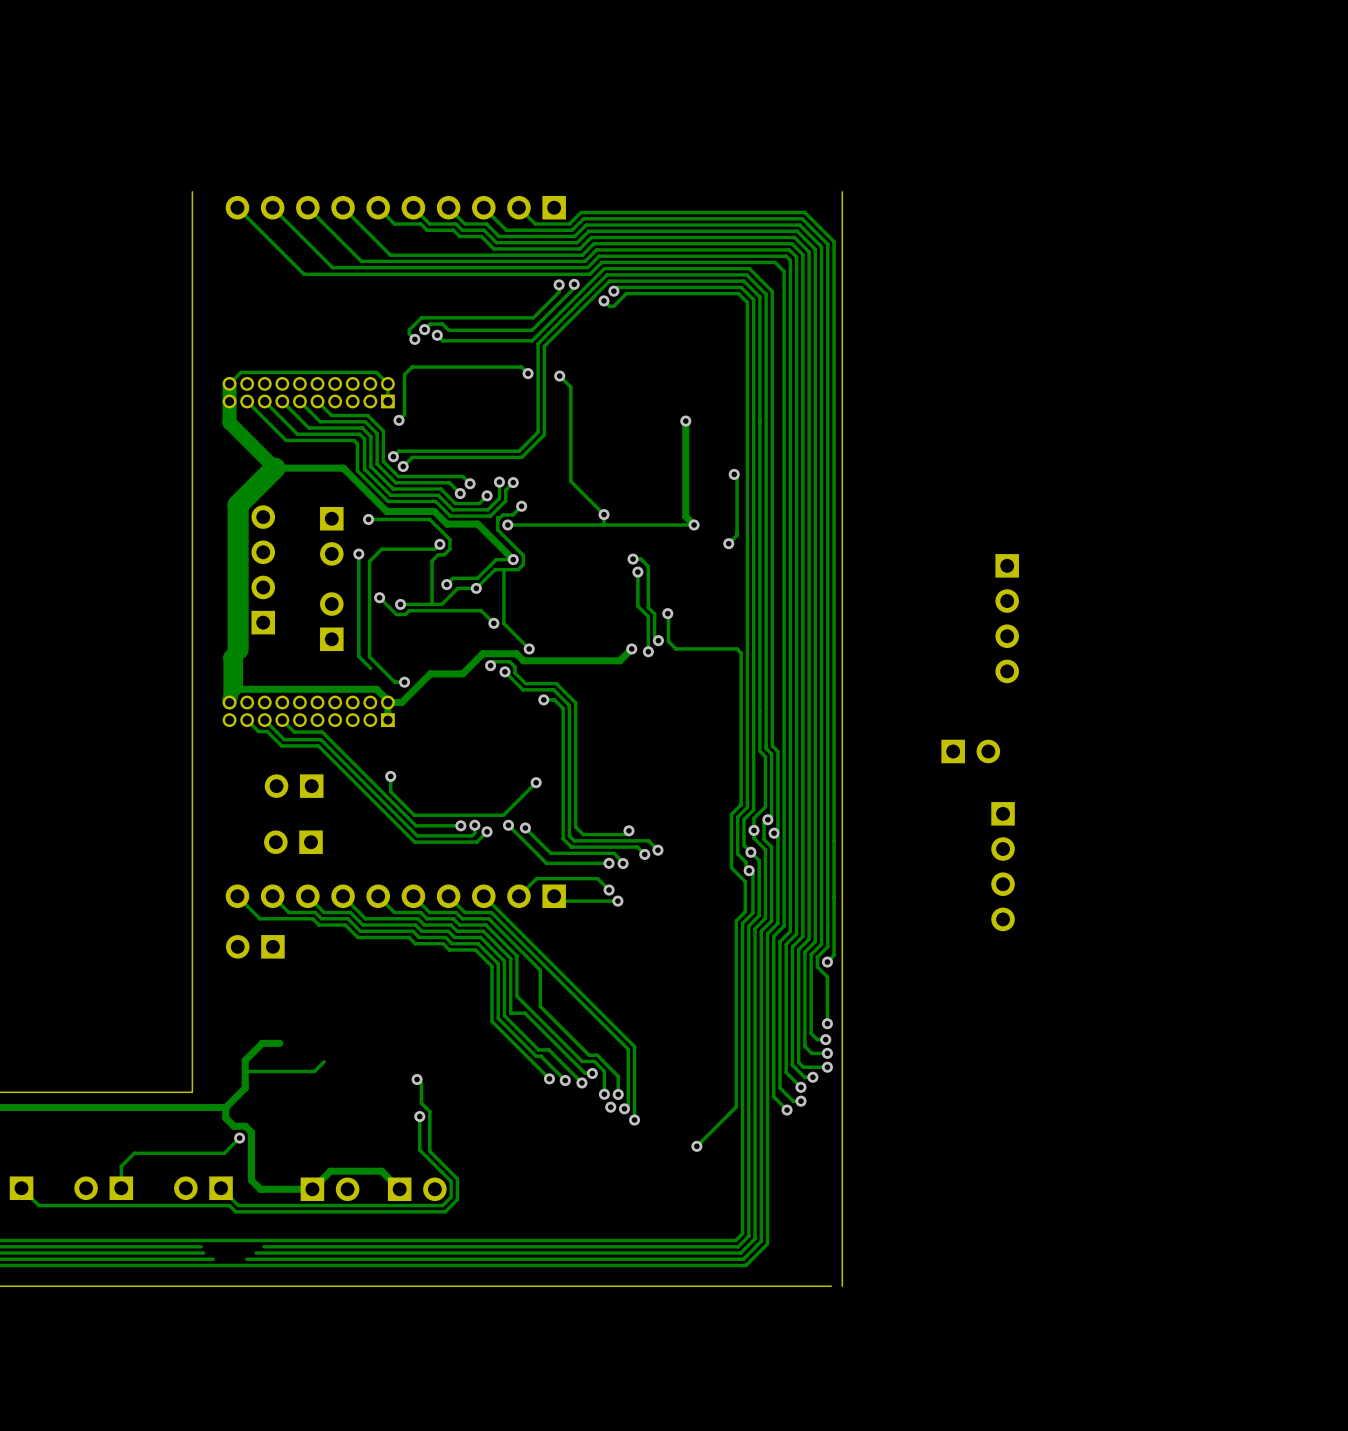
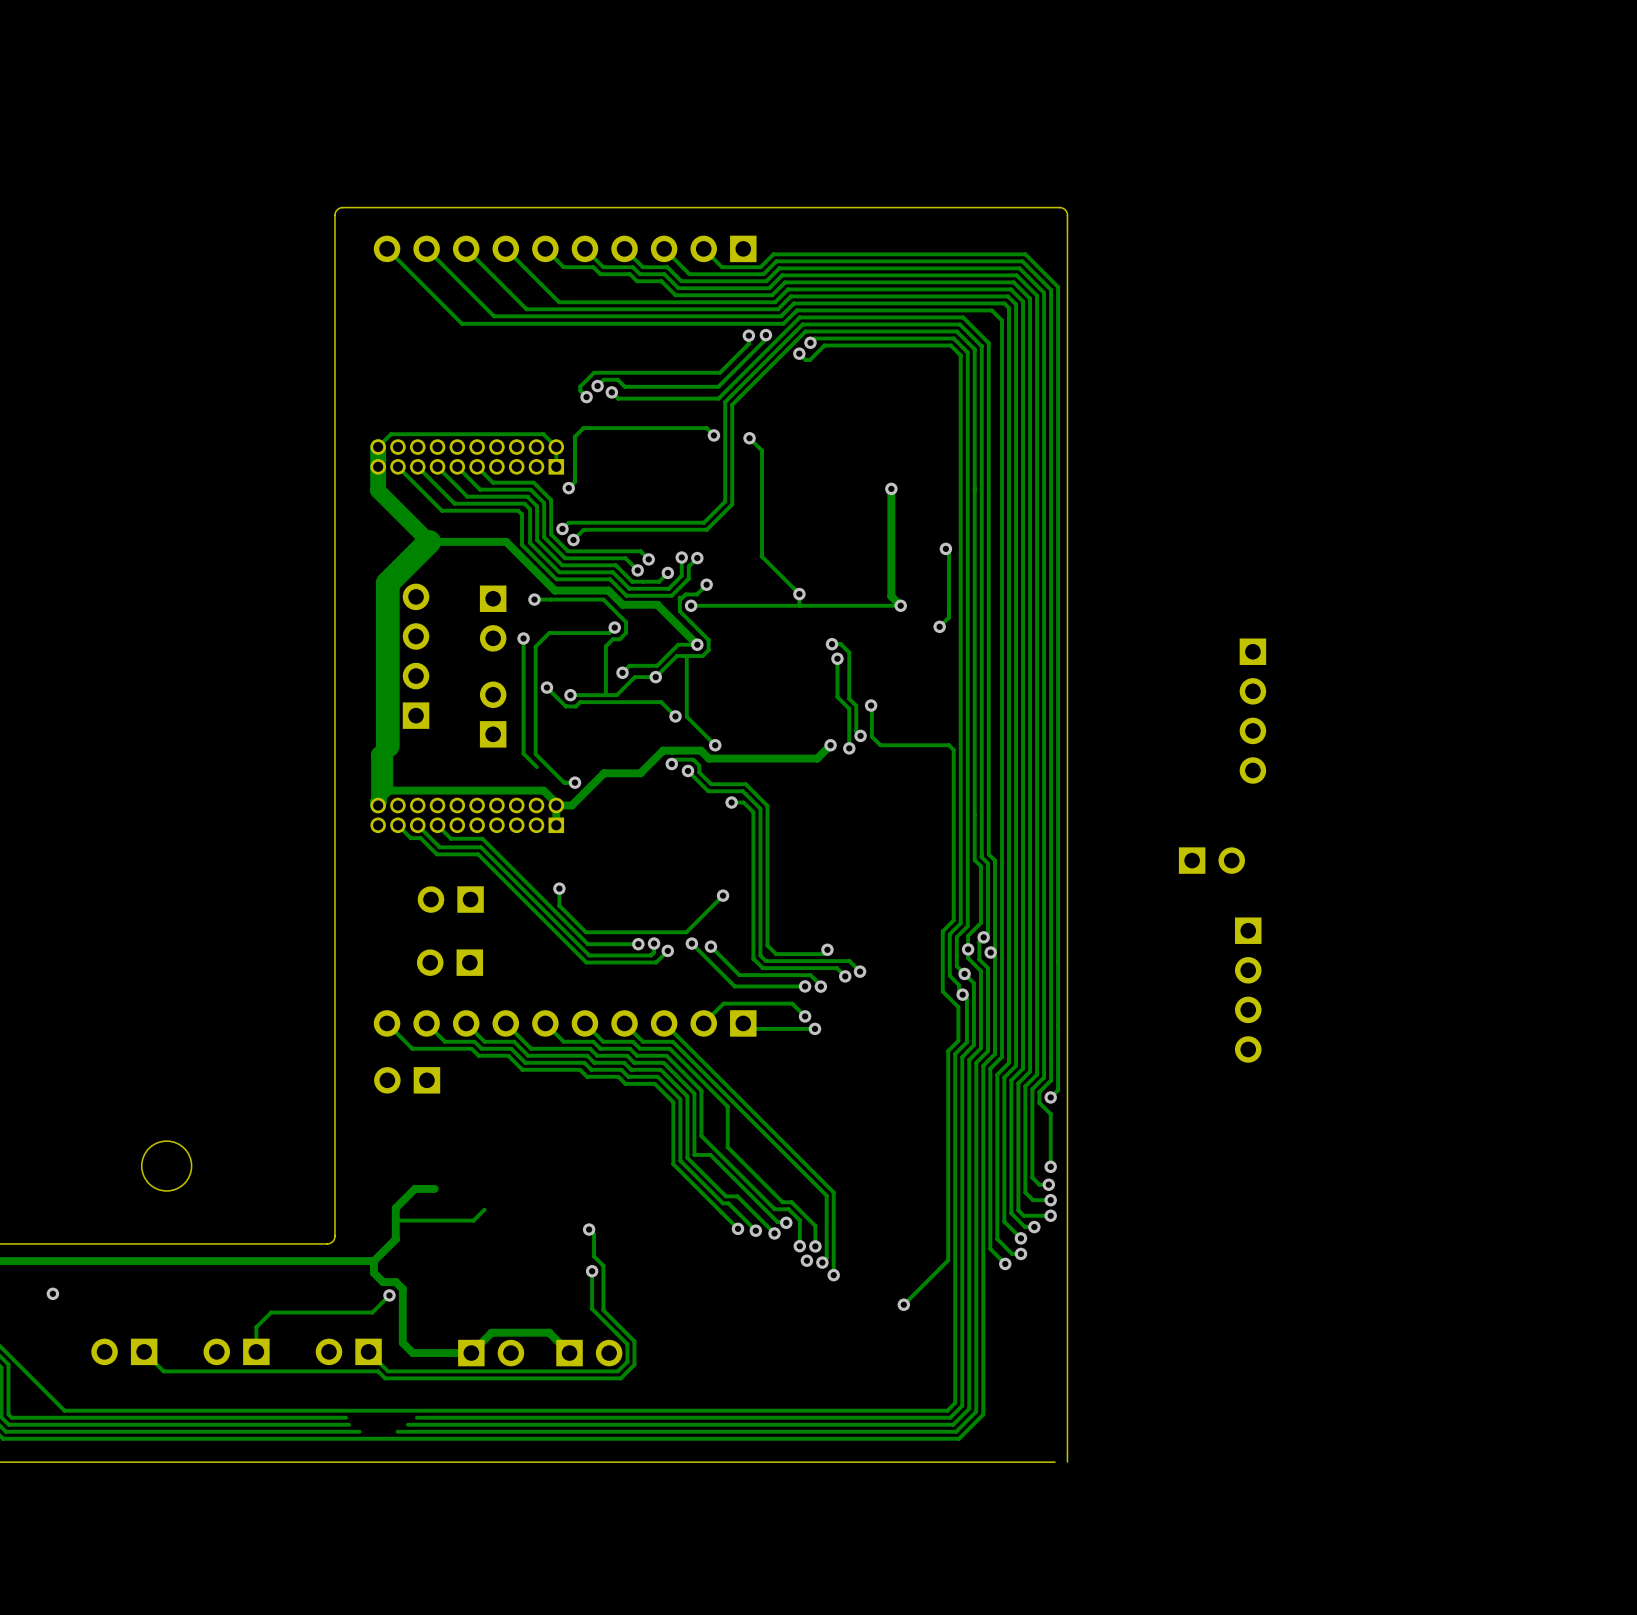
board edge: (192, 191) (192, 1092) (184, 1092) -> (1067, 230) (1067, 213) (1064, 209) (1059, 207) (342, 207) (336, 210) (334, 215) (334, 1236) (332, 1241) (327, 1243)
round board edge: none -> [140, 1140, 193, 1192]

